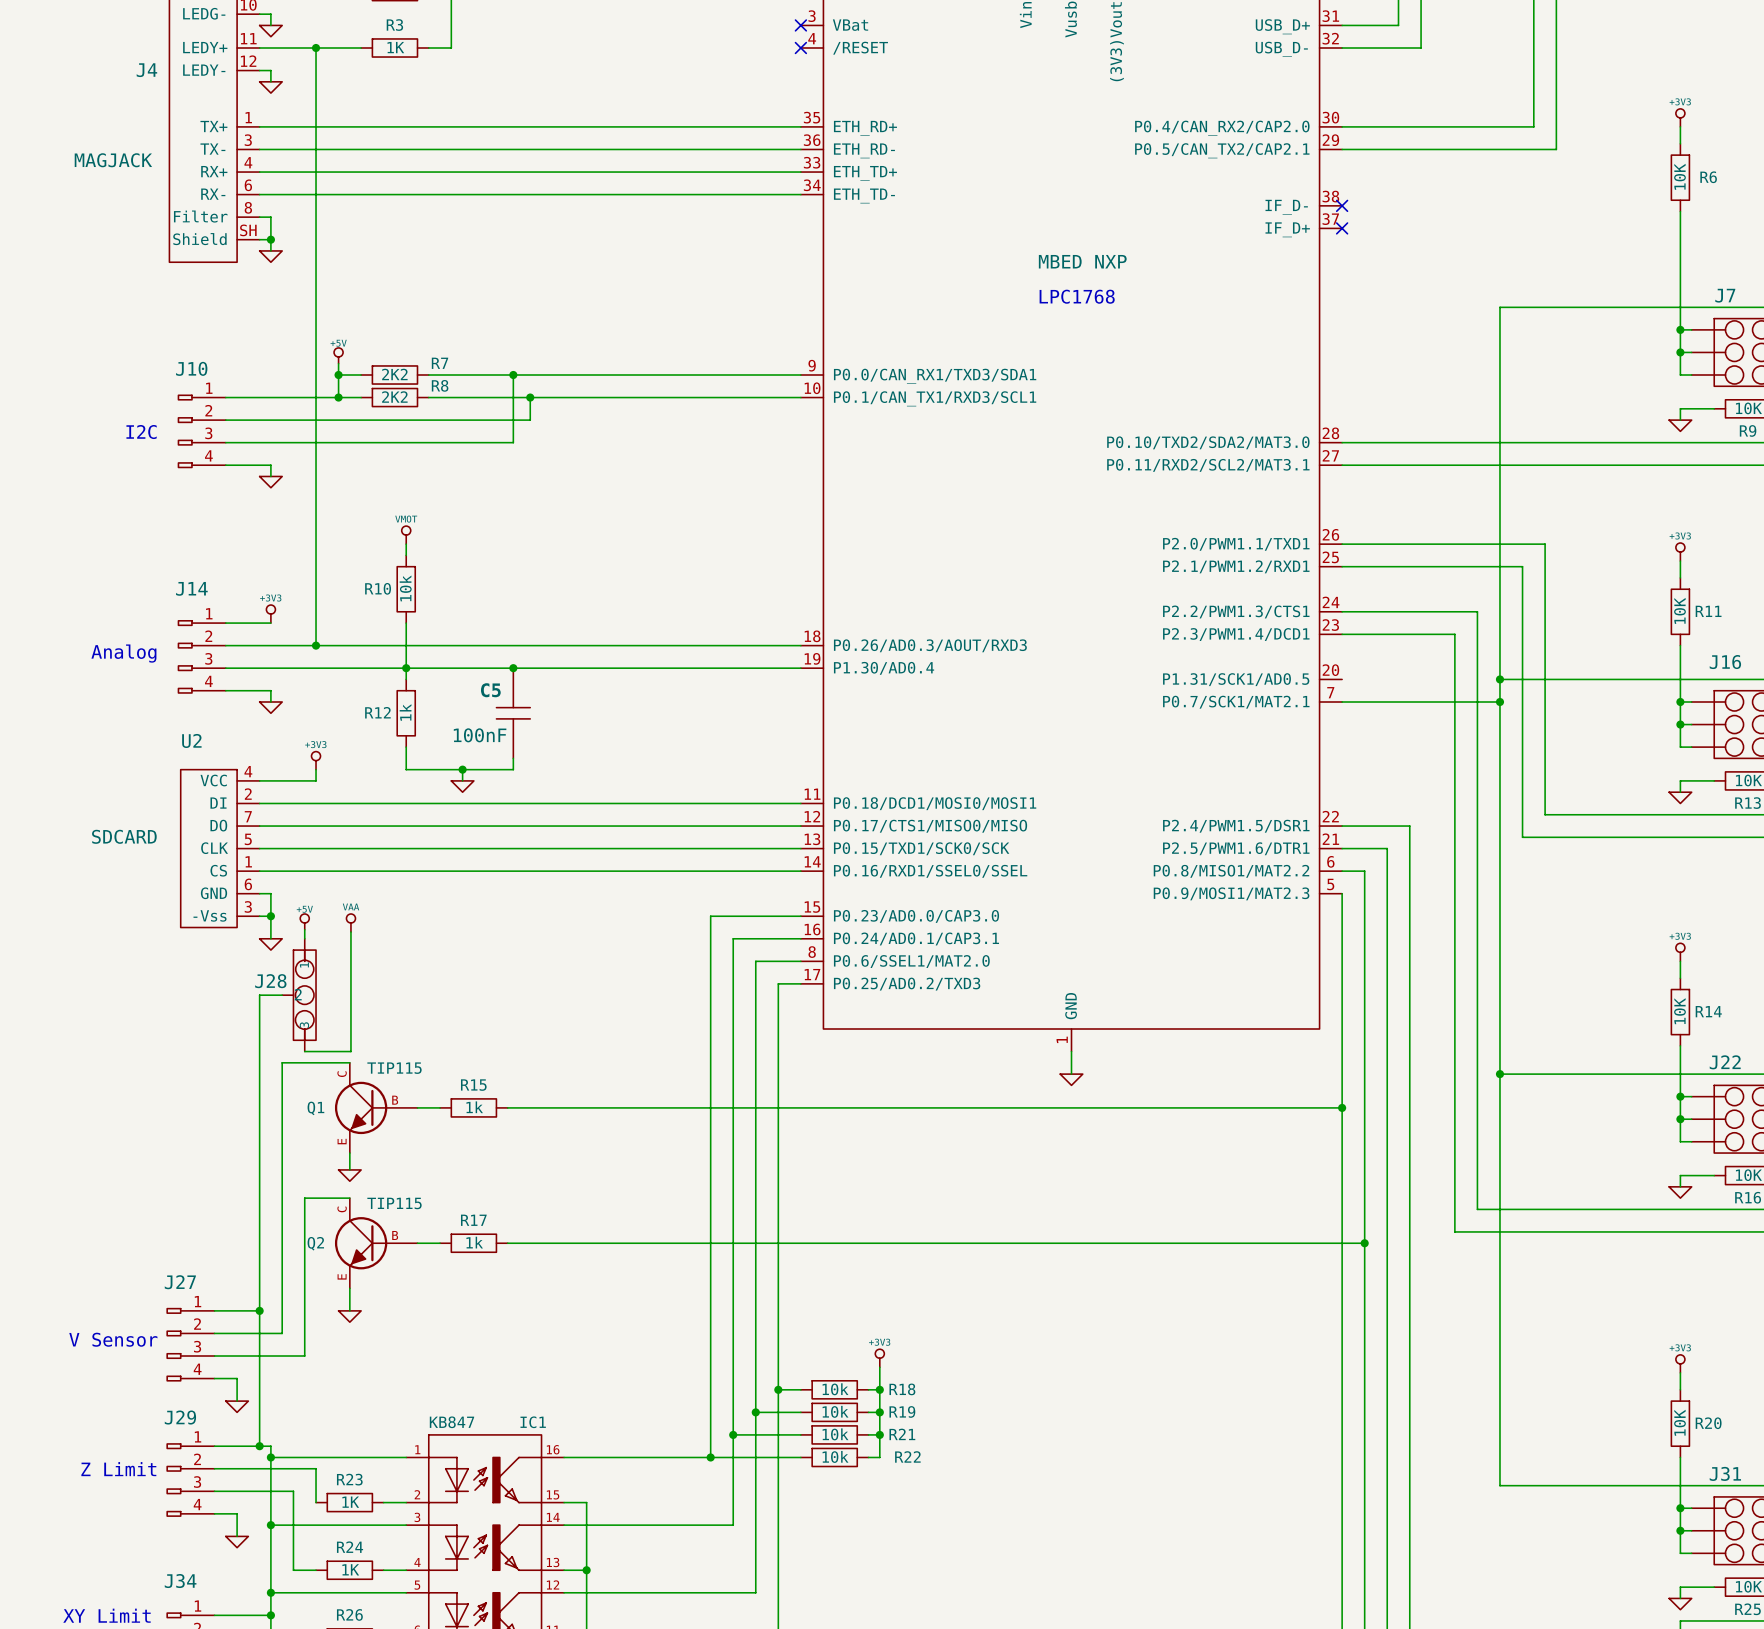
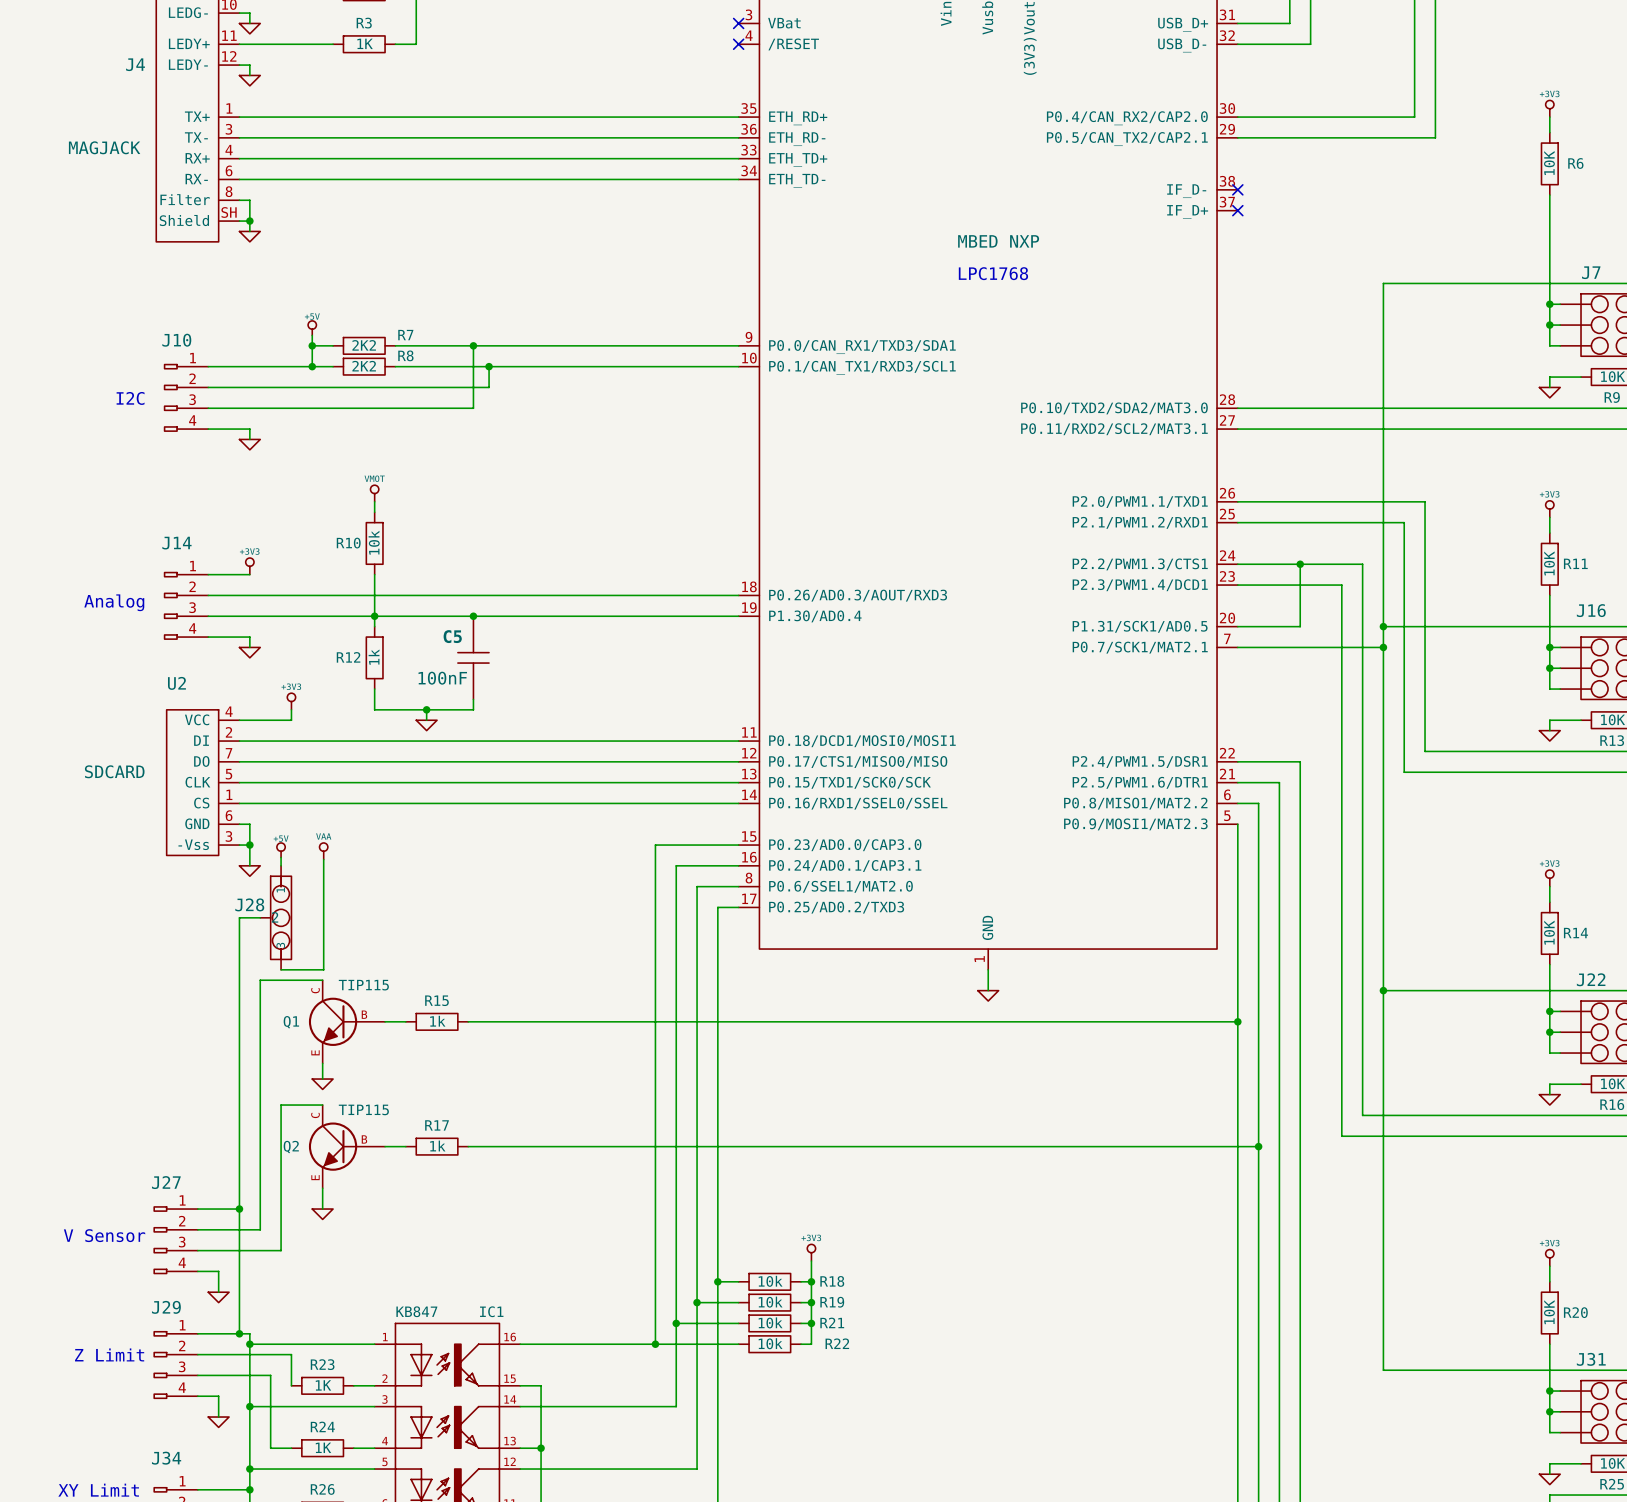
wire: (316, 47) (316, 645) -> none
junction: (316, 47) -> none
wire: none -> (1300, 564) (1300, 626) (1237, 626)
junction: none -> (1300, 564)
junction: (316, 645) -> none

